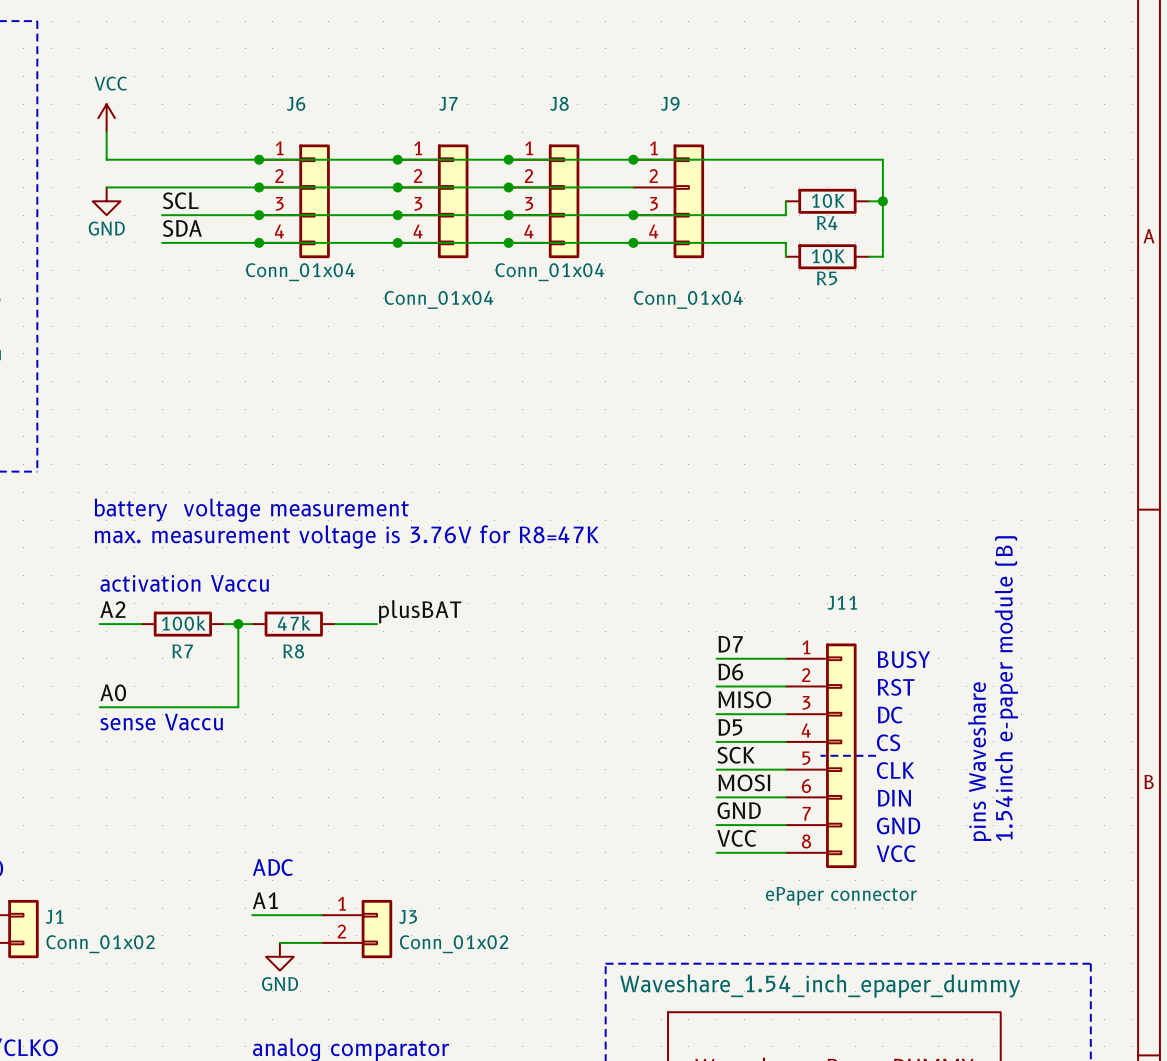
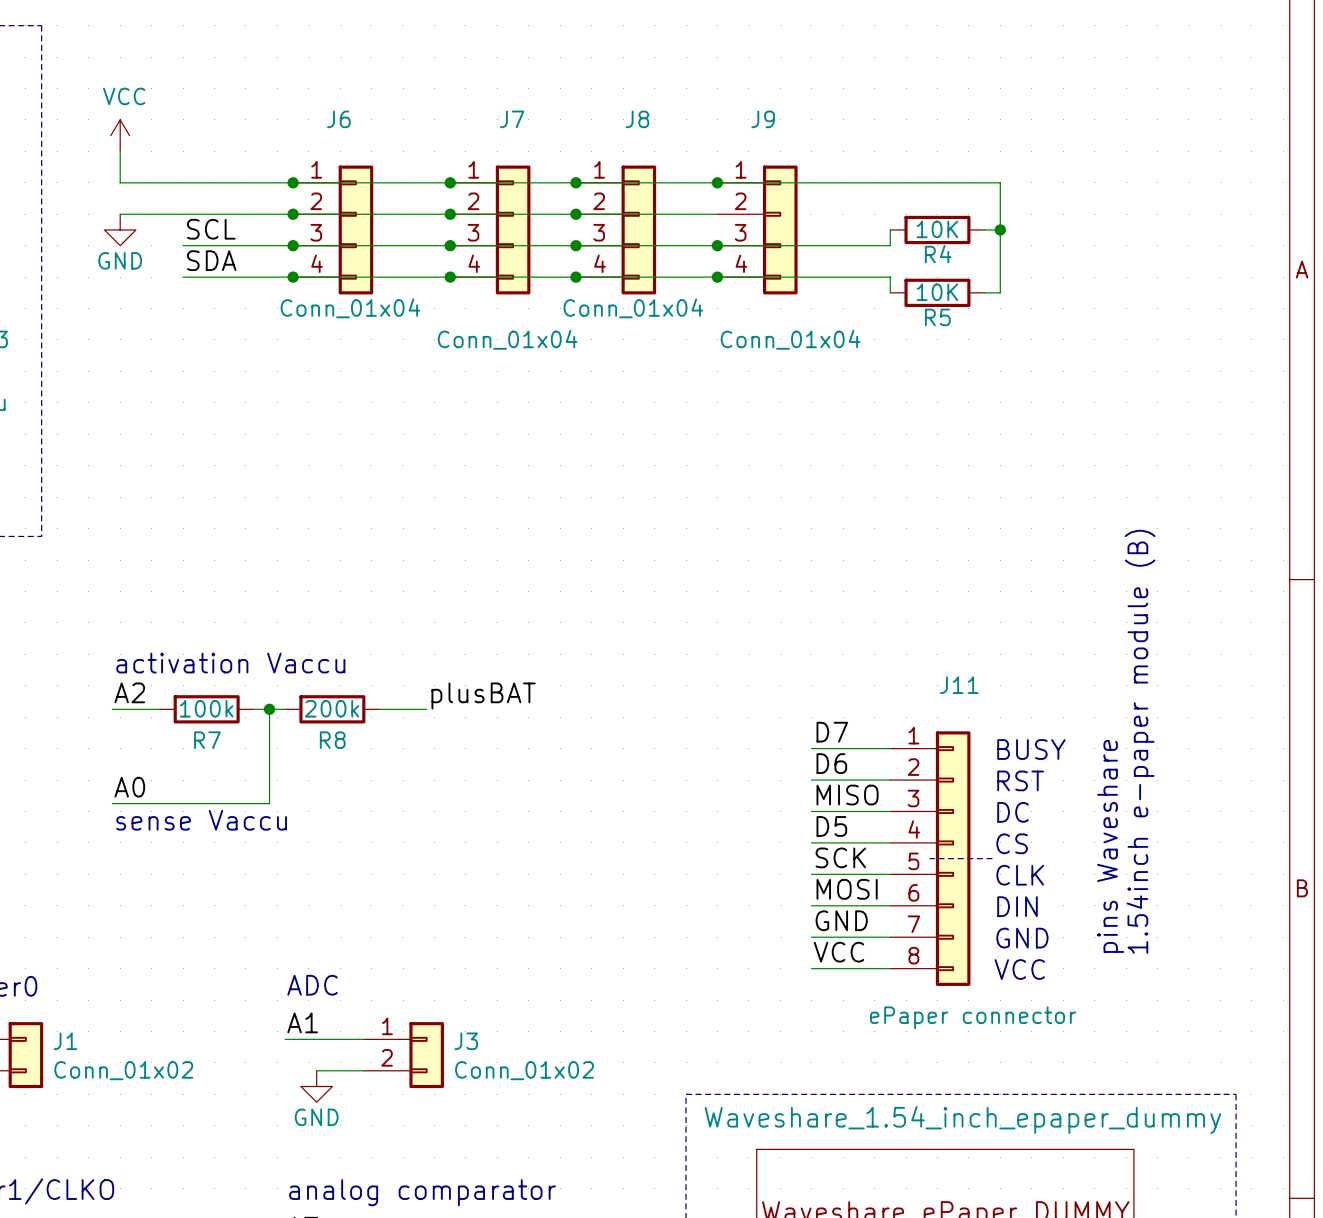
text: battery voltage measurement (251, 510) -> none
text: max. measurement voltage is 3.76V for R8=47K (346, 537) -> none
R8 value: 47k (294, 623) -> 200k (332, 708)

